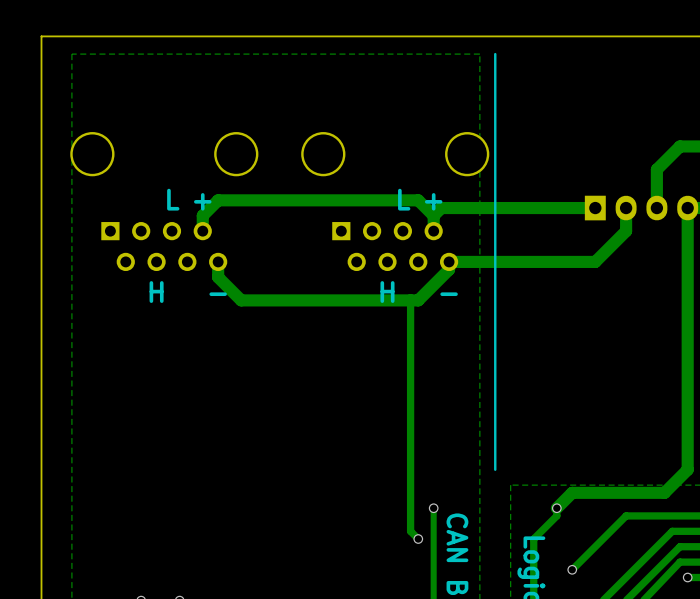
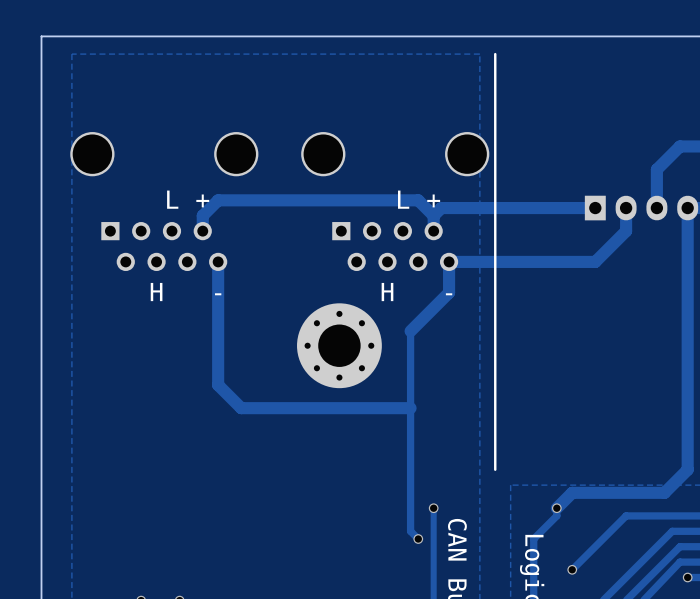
track: (449, 269) (418, 300) (241, 300) (218, 277) -> (410, 408) (241, 408) (218, 385) (218, 277)
track: (410, 300) (410, 331) -> (449, 269) (449, 292) (410, 331)
part: none -> (339, 345)

